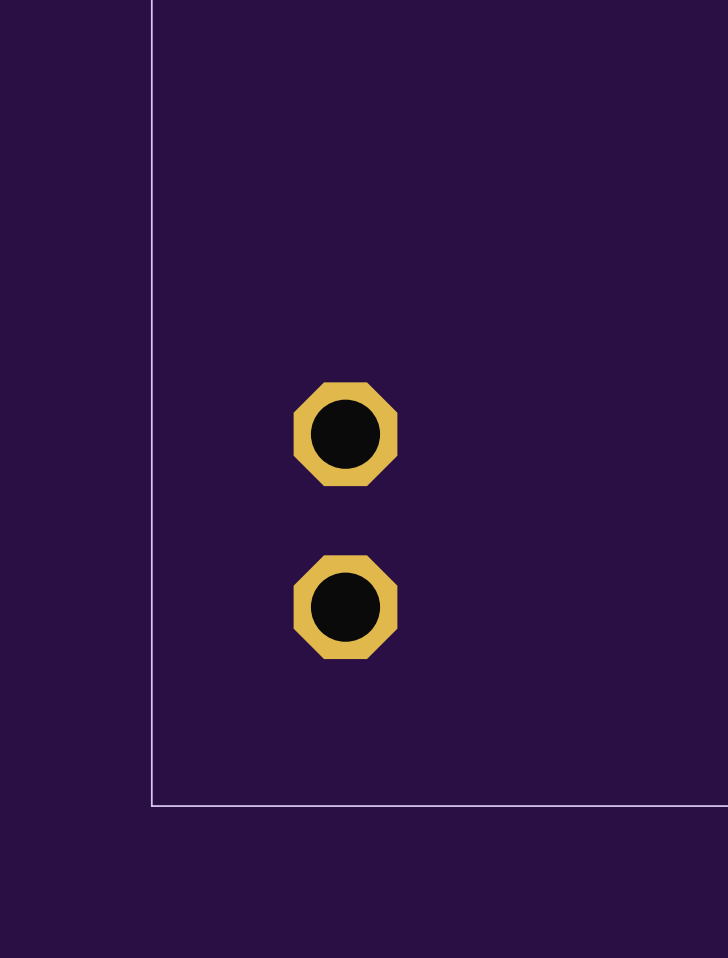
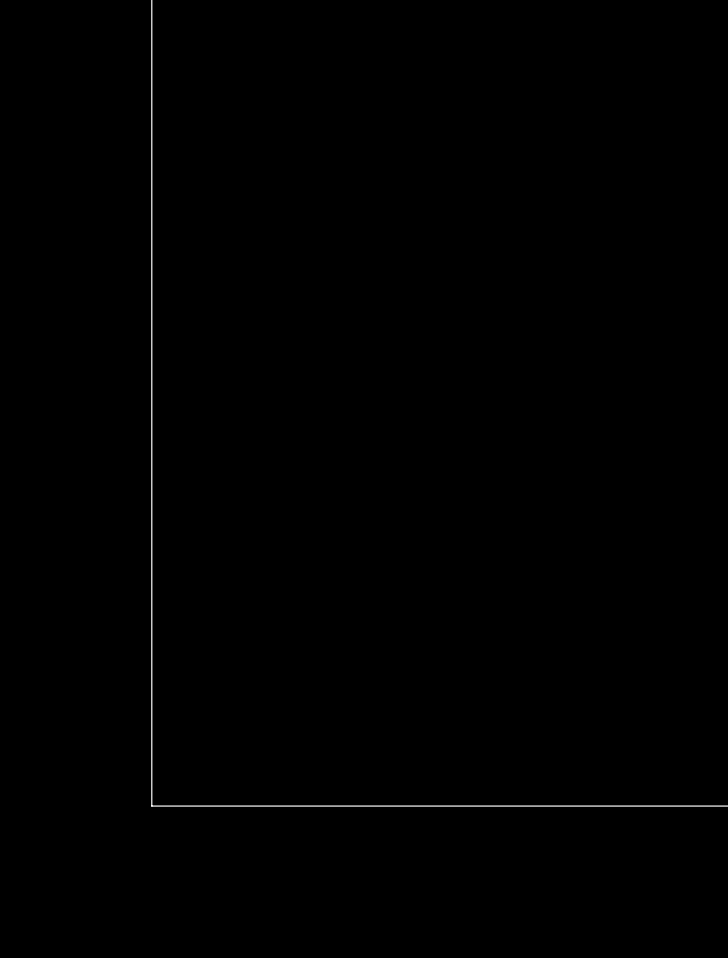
part: (345, 520) -> none

